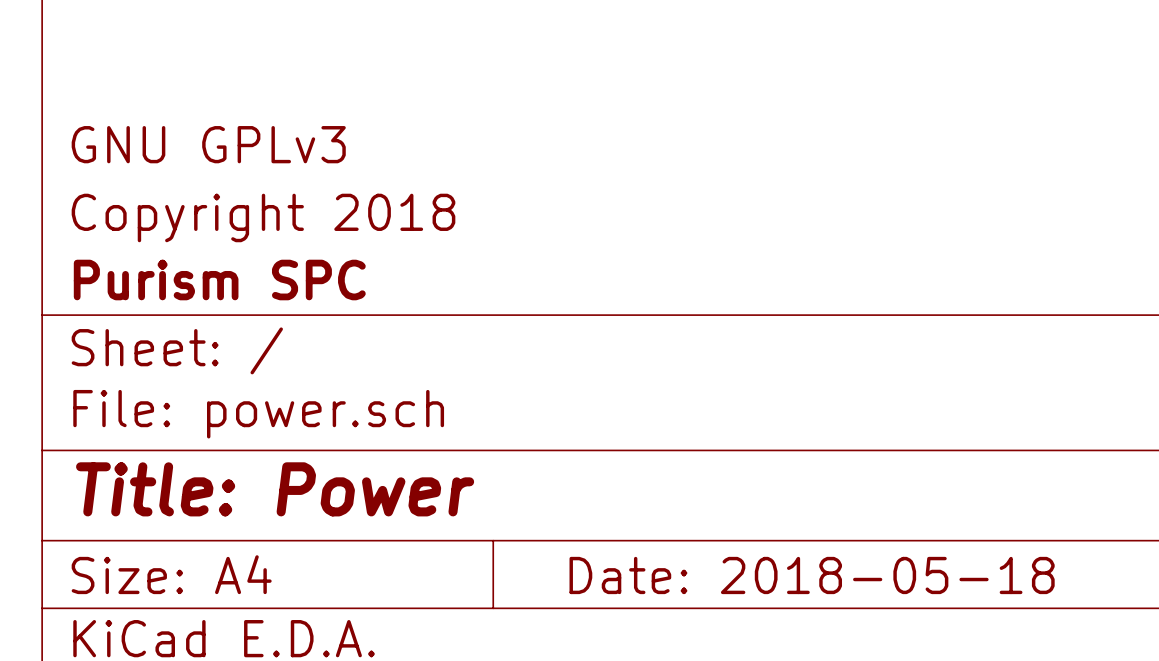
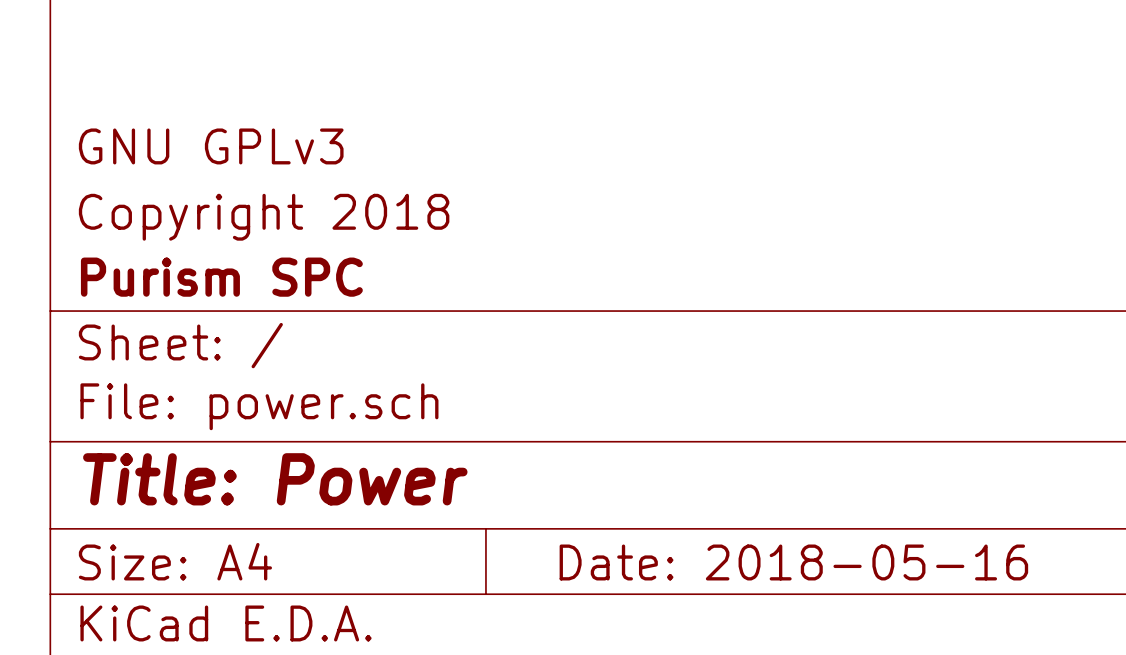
title block: Date: 2018-05-18 (812, 575) -> Date: 2018-05-16 (793, 562)

